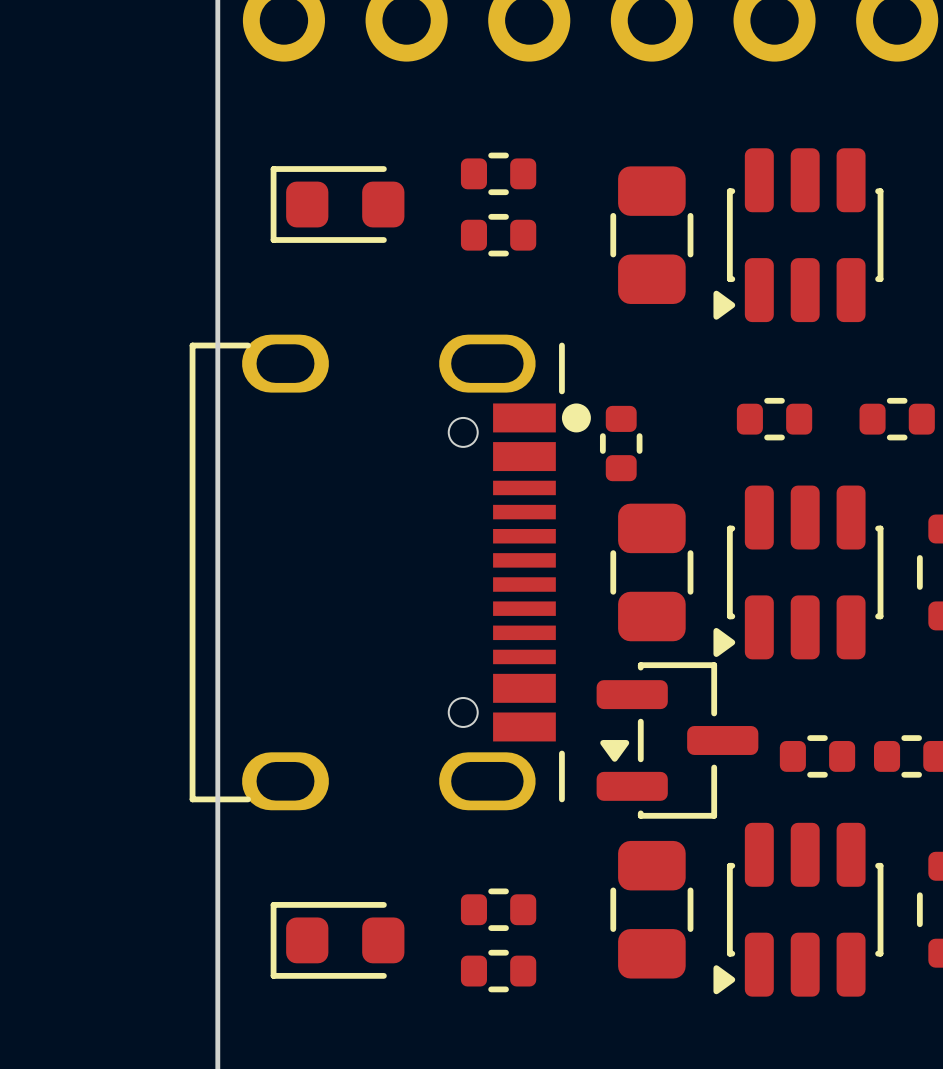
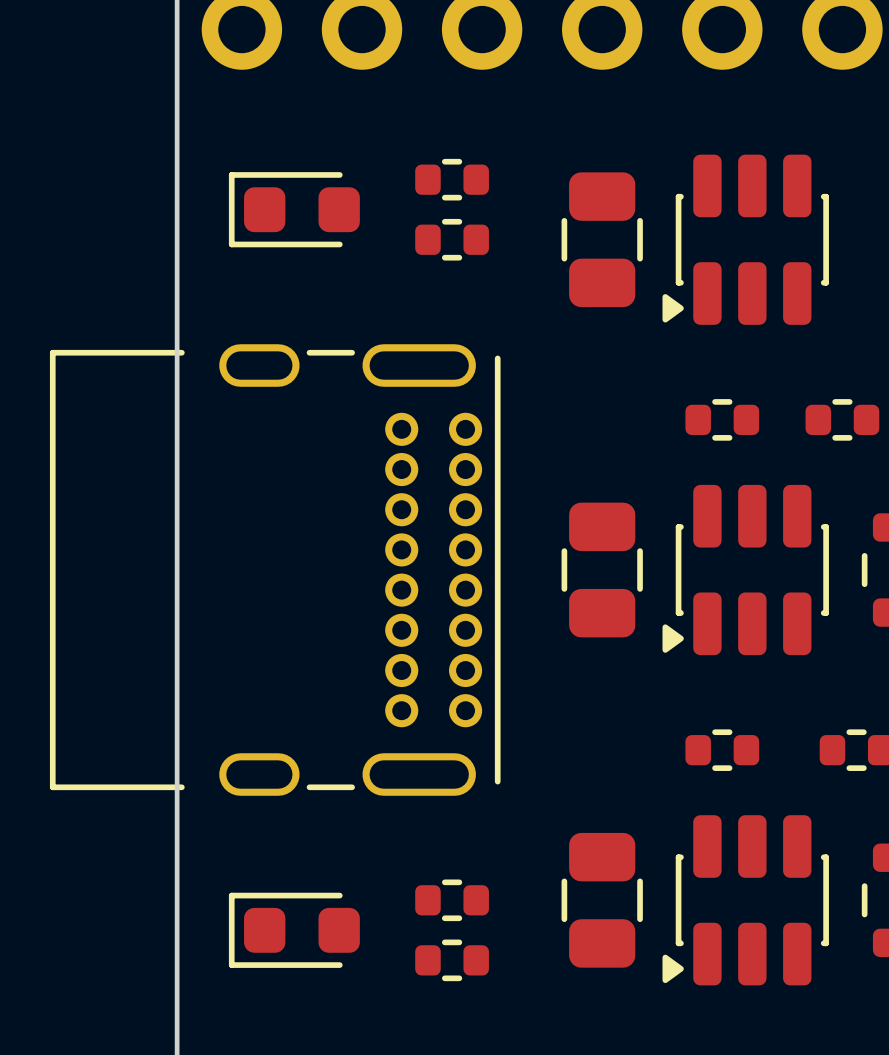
part: (621, 443) -> none
part: none -> (275, 570)
part: (390, 572) -> none
part: (677, 740) -> none
part position: (817, 756) -> (722, 750)

